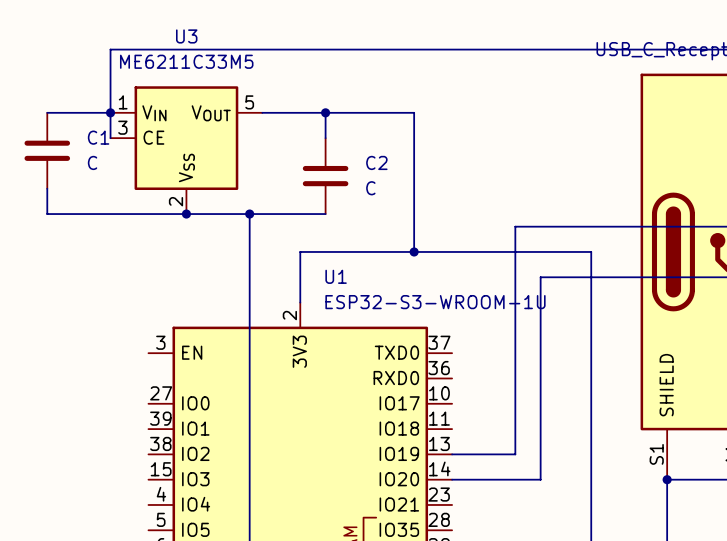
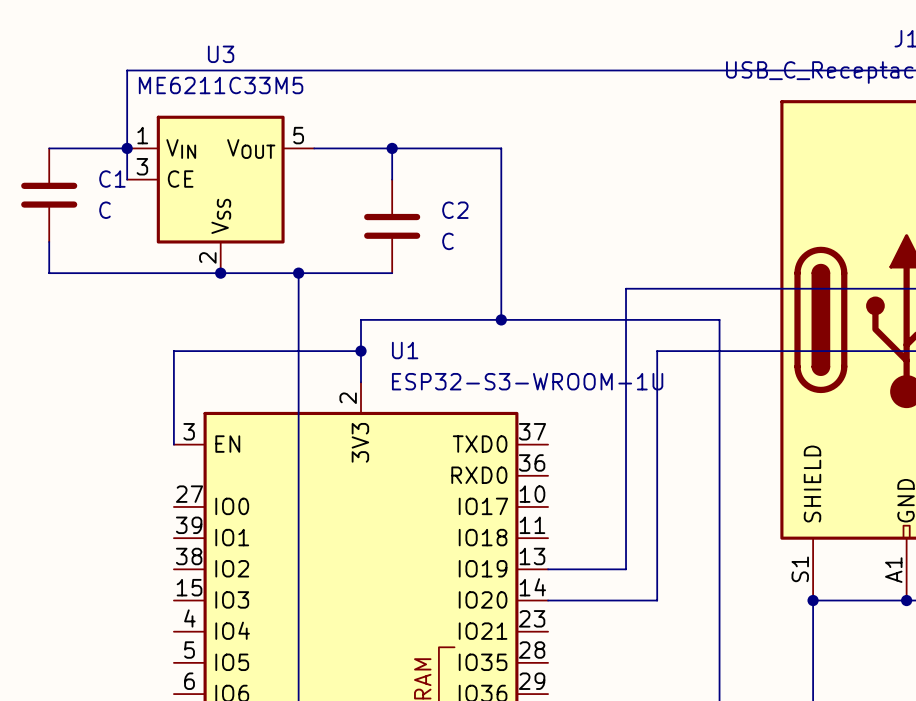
wire: none -> (360, 351) (173, 351) (173, 444)
junction: none -> (360, 351)

